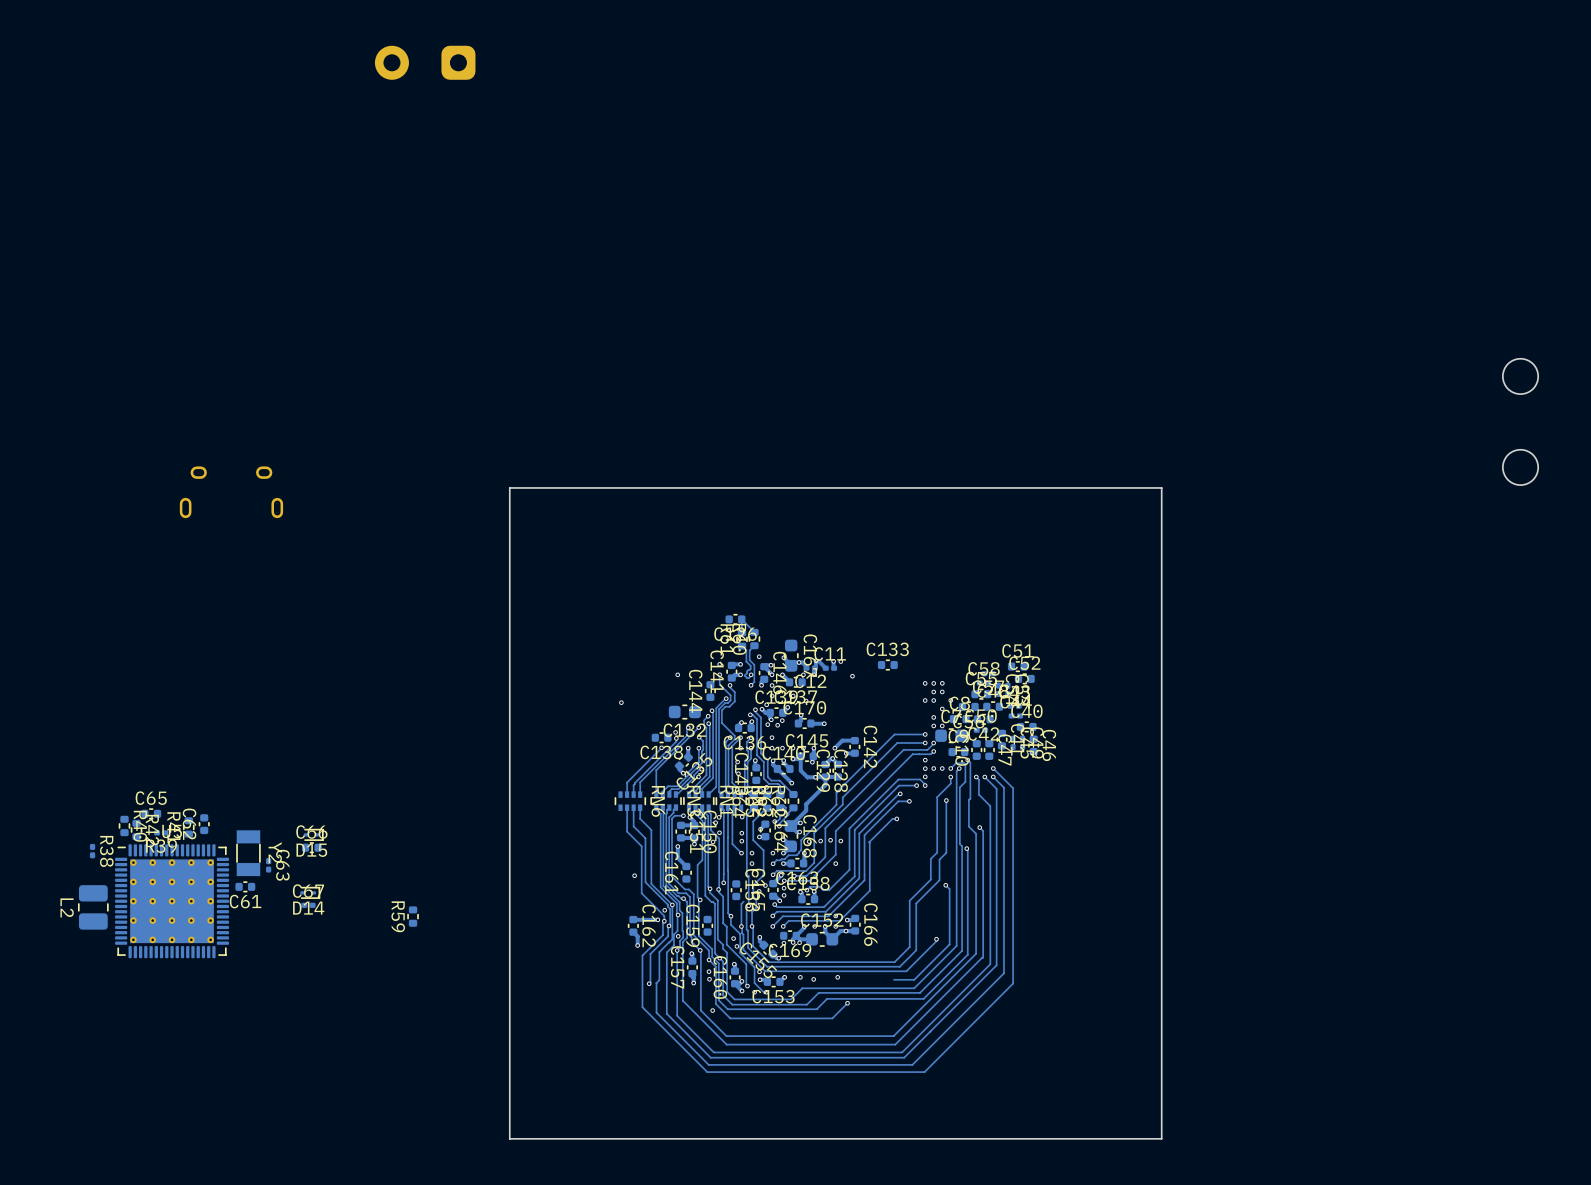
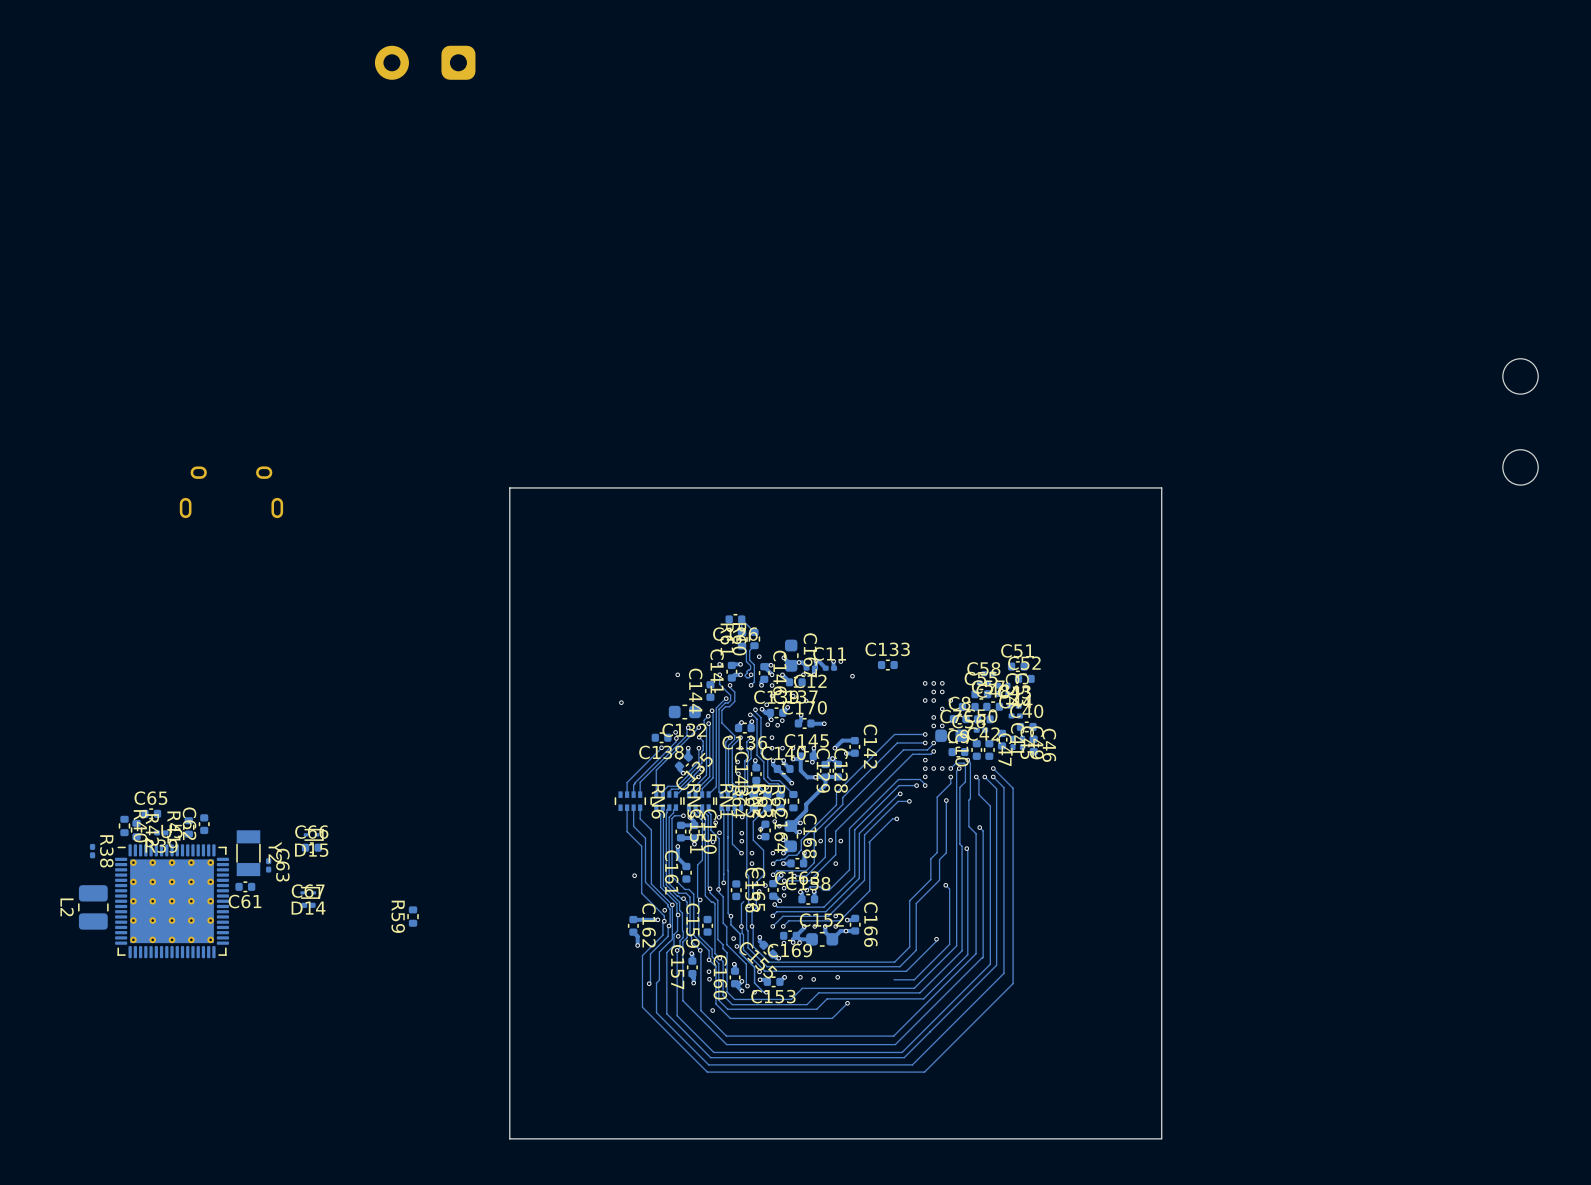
track: (780, 807) (783, 805) (785, 812) (774, 821) -> none
track: (793, 807) (779, 826) -> none

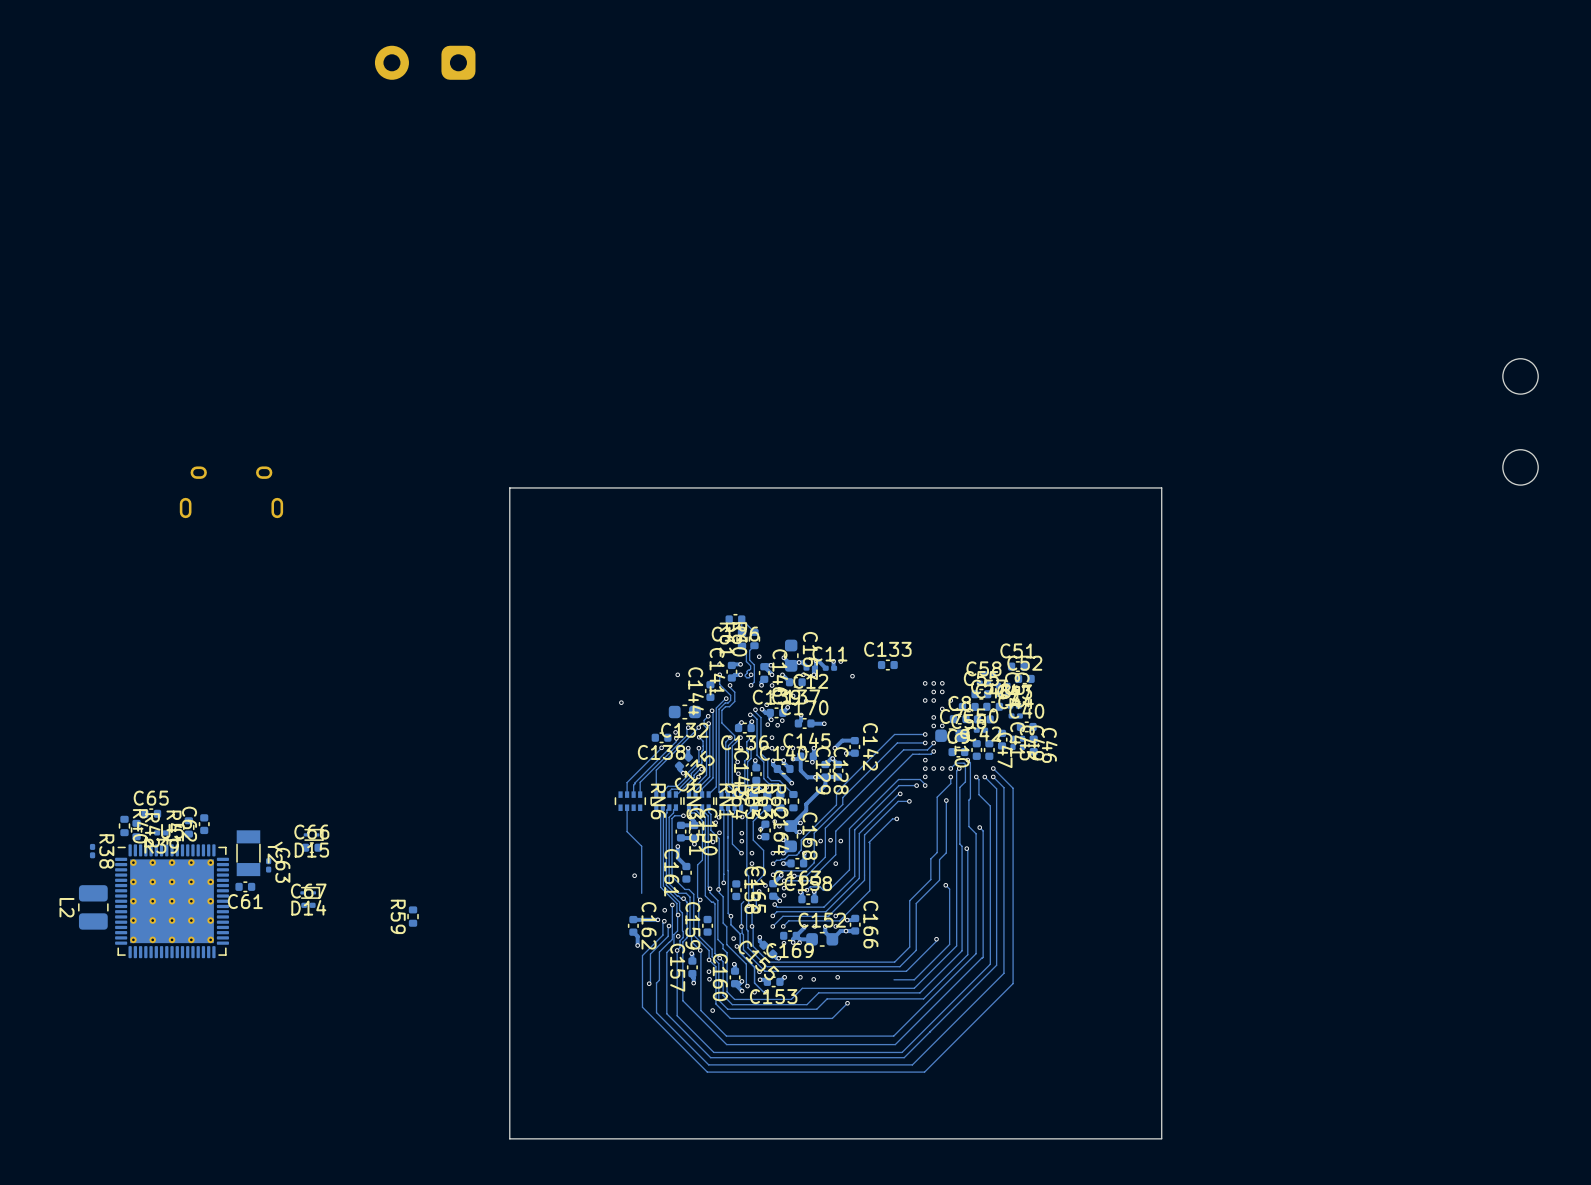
track: (633, 807) (633, 826) (645, 838) (645, 882) (667, 904) (670, 908) (669, 925) -> none
track: (640, 807) (640, 818) (651, 830) (651, 884) (672, 904) -> none
track: (641, 893) (664, 915) (664, 921) -> none

